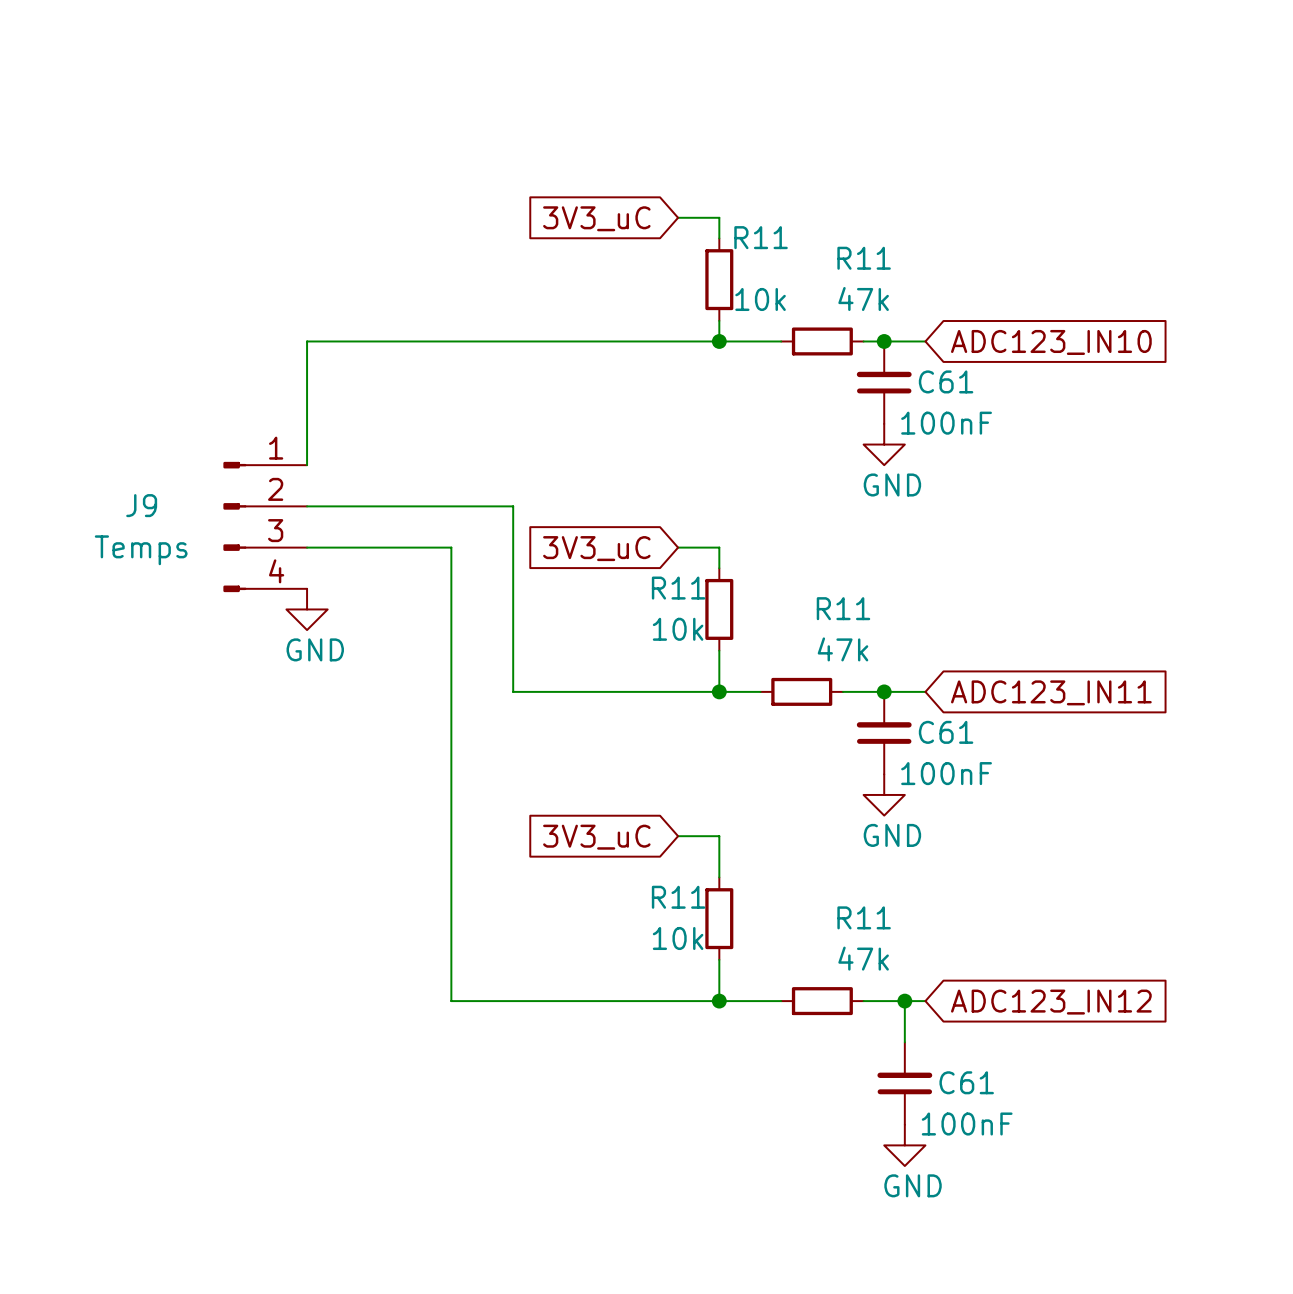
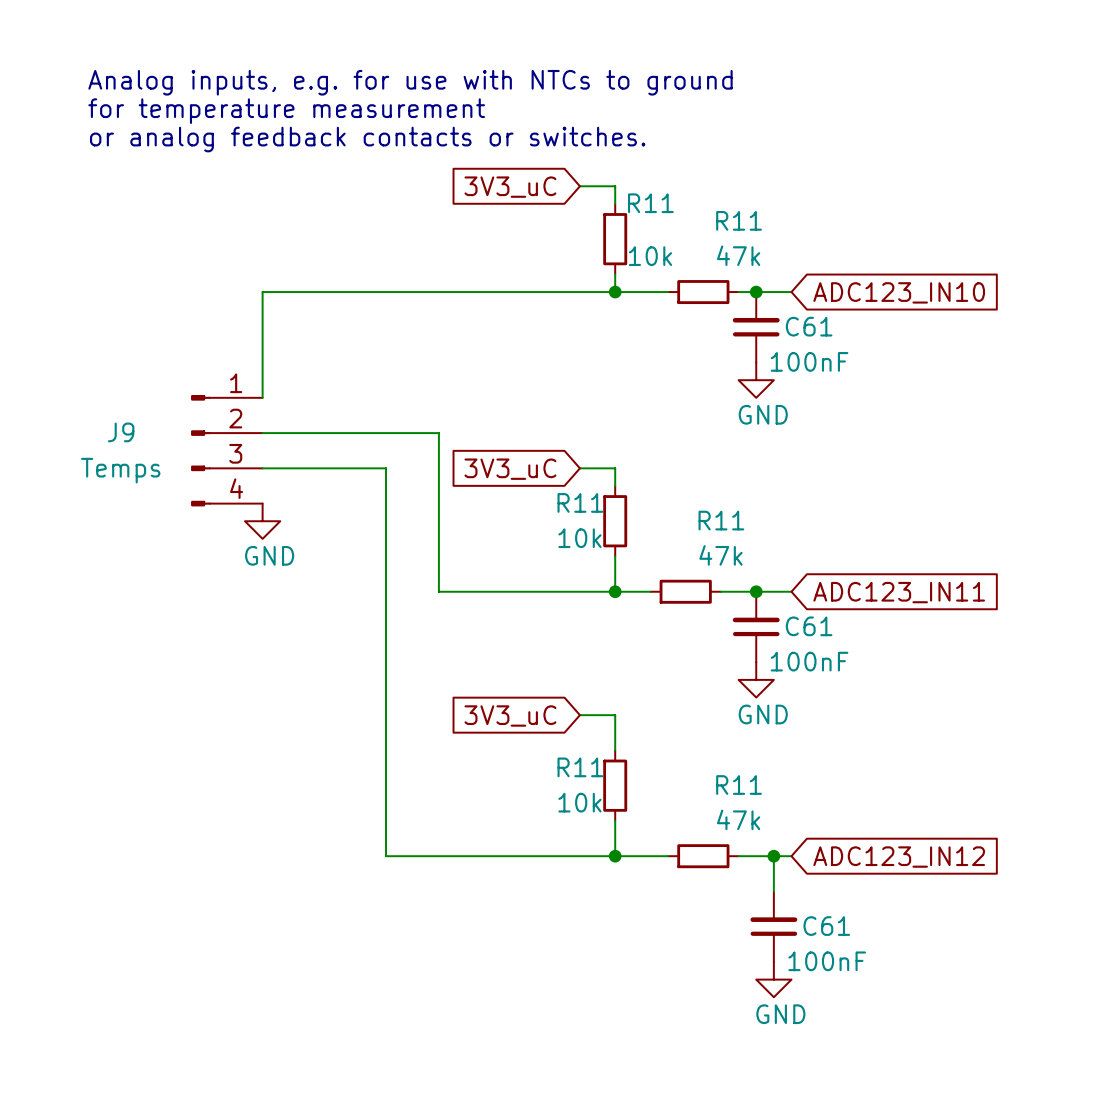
text: none -> Analog inputs, e.g. for use with NTCs to ground (410, 82)
text: none -> for temperature measurement (286, 111)
text: none -> or analog feedback contacts or switches. (367, 139)

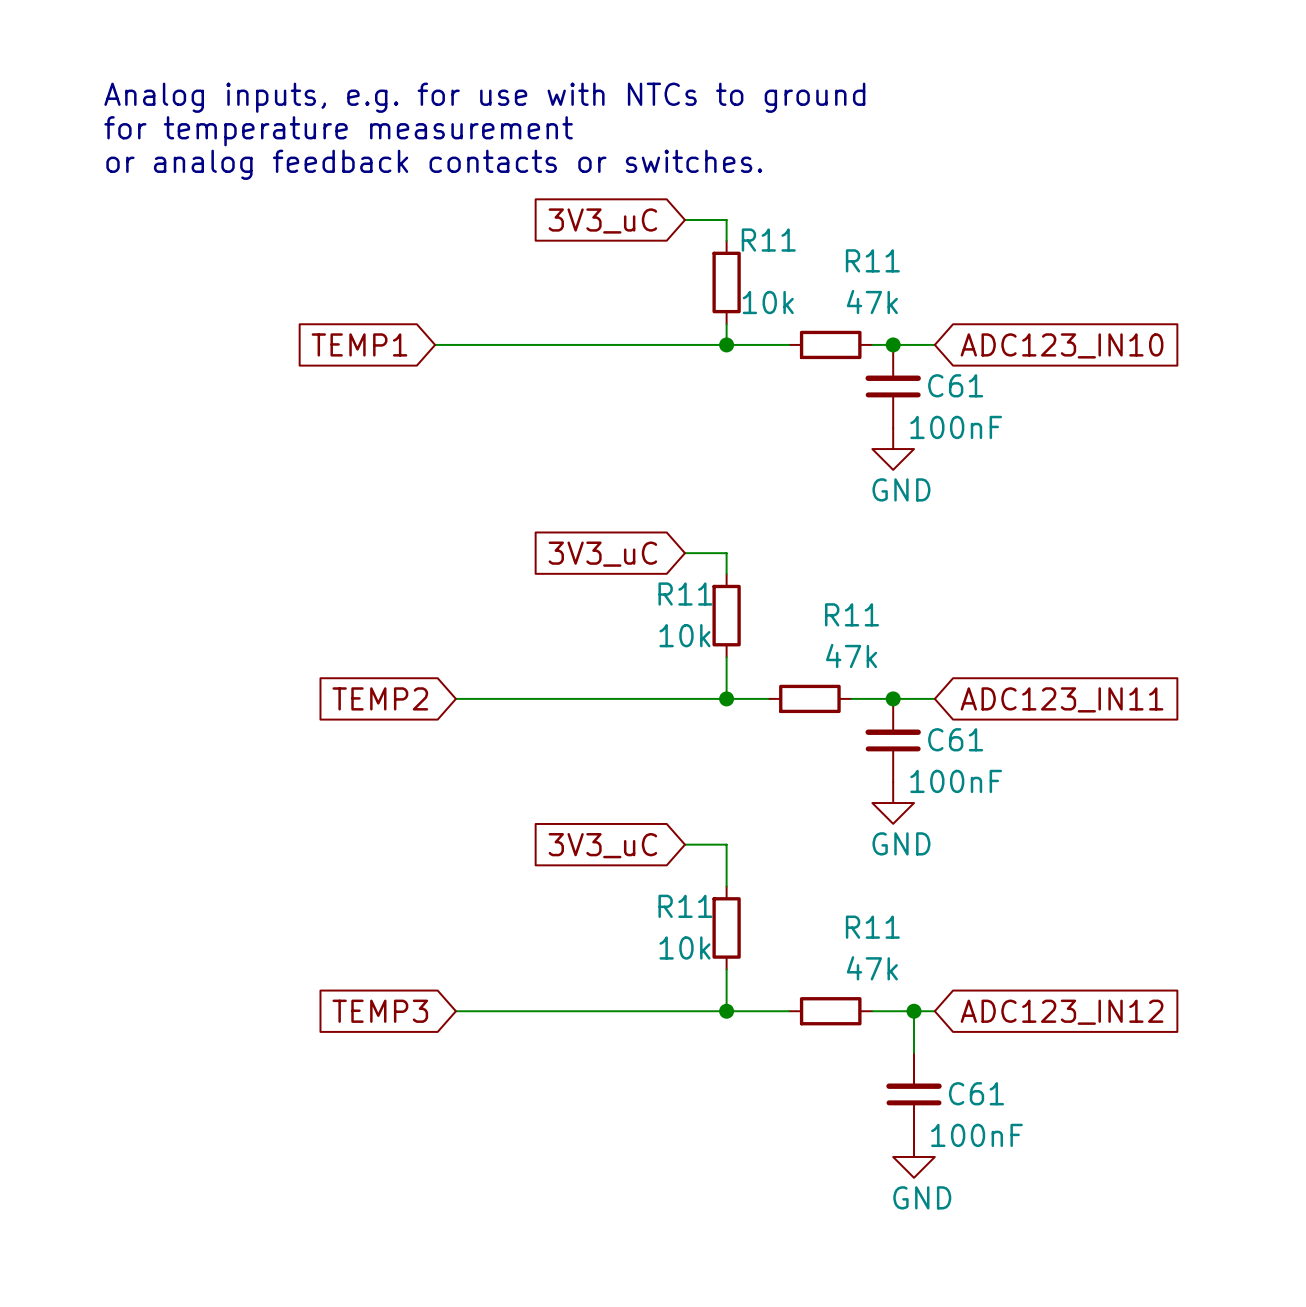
global label: none -> TEMP1 (359, 344)
wire: (368, 292) (262, 292) (262, 397) -> none
wire: (262, 433) (438, 433) (438, 591) -> (455, 698) (518, 698)
J9: Temps (226, 450) -> none
wire: (262, 468) (386, 468) (386, 856) -> none
power symbol: GND (262, 521) -> none
global label: none -> TEMP2 (380, 698)
global label: none -> TEMP3 (380, 1011)

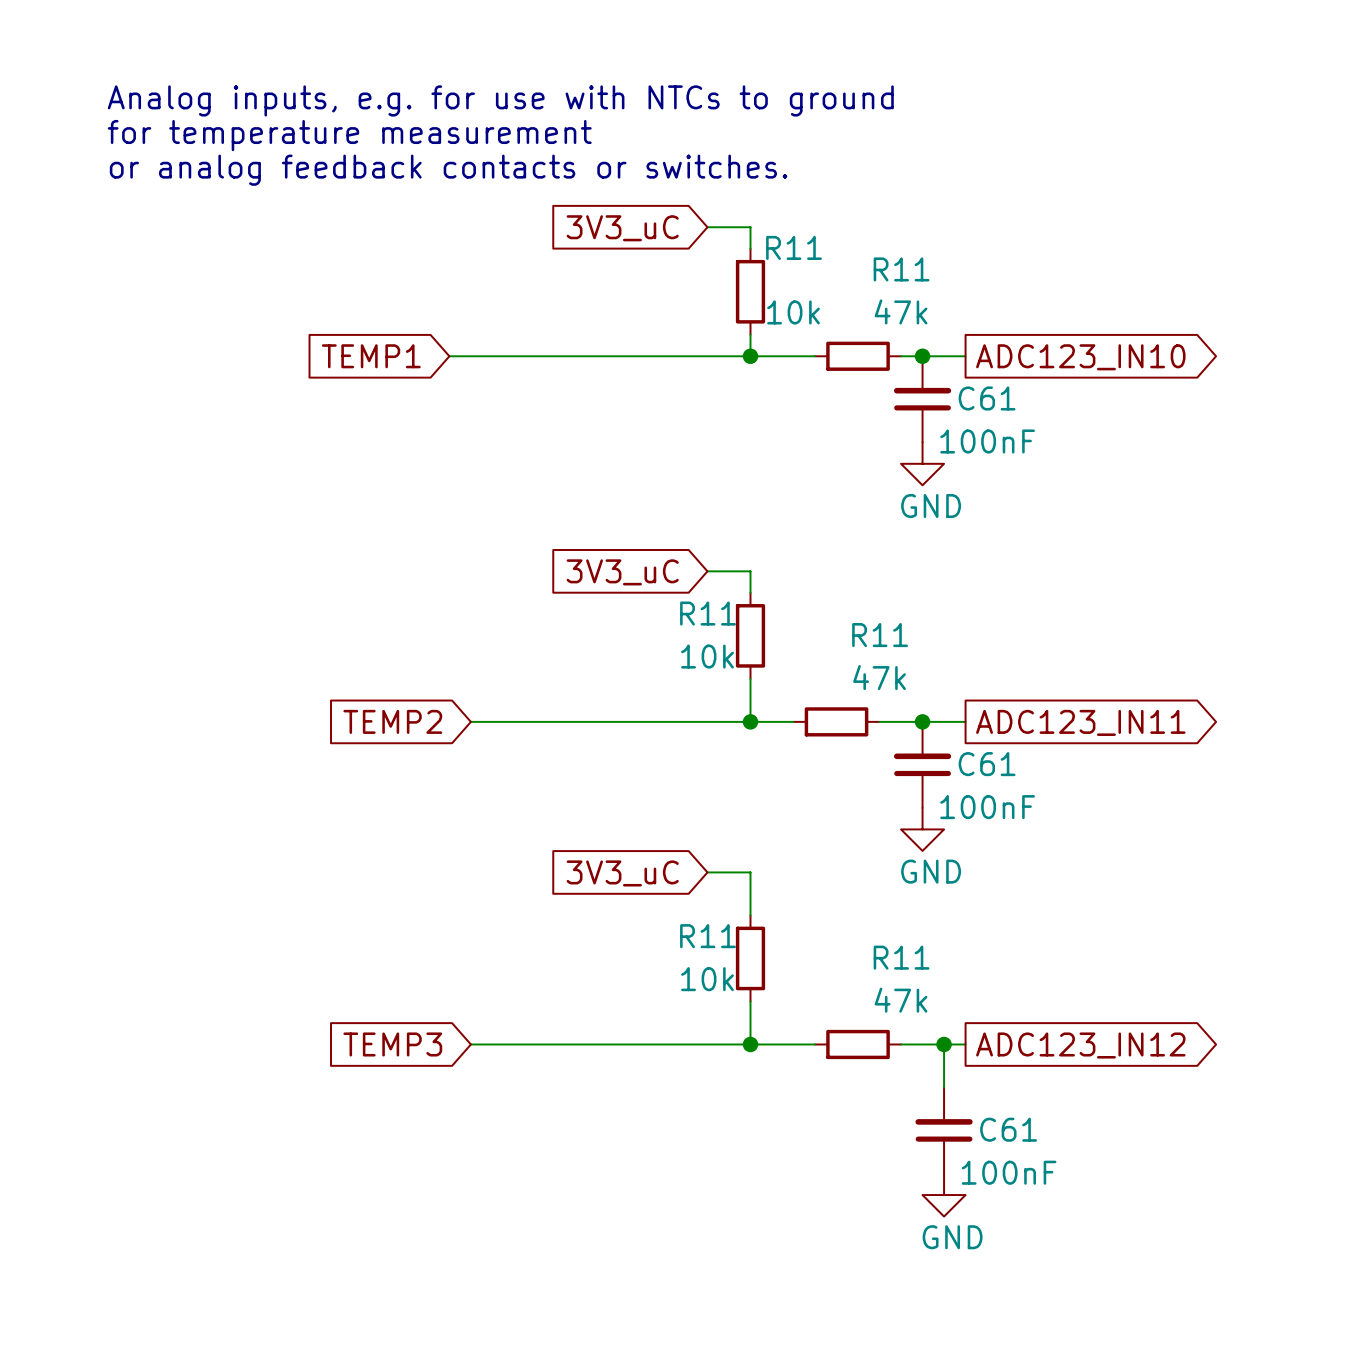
global label shape: input (1062, 345) -> output (1080, 357)
global label shape: input (1062, 699) -> output (1080, 722)
global label shape: input (1062, 1012) -> output (1080, 1045)

